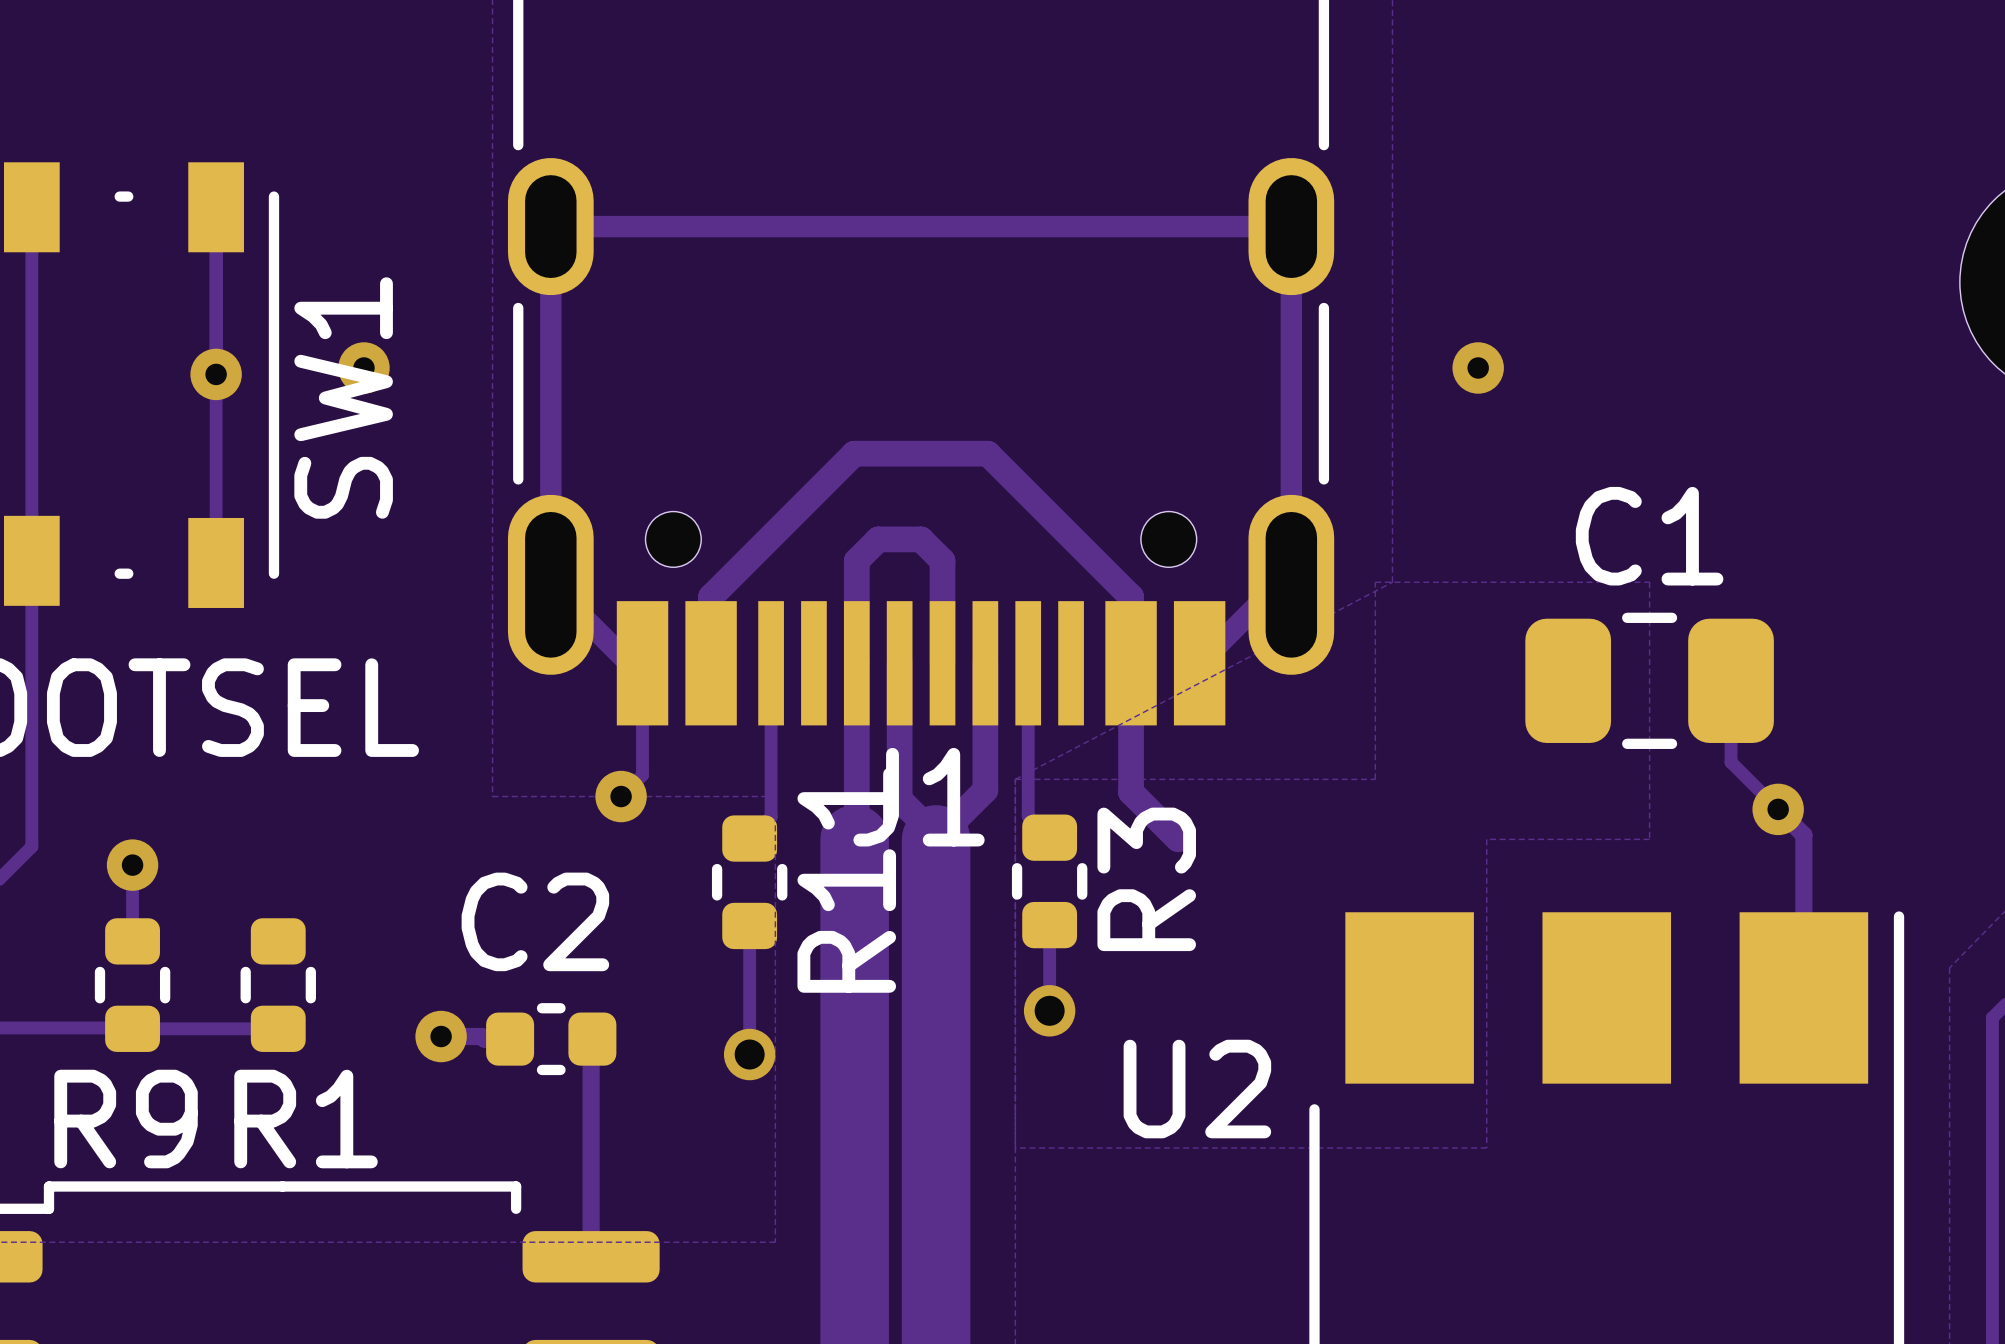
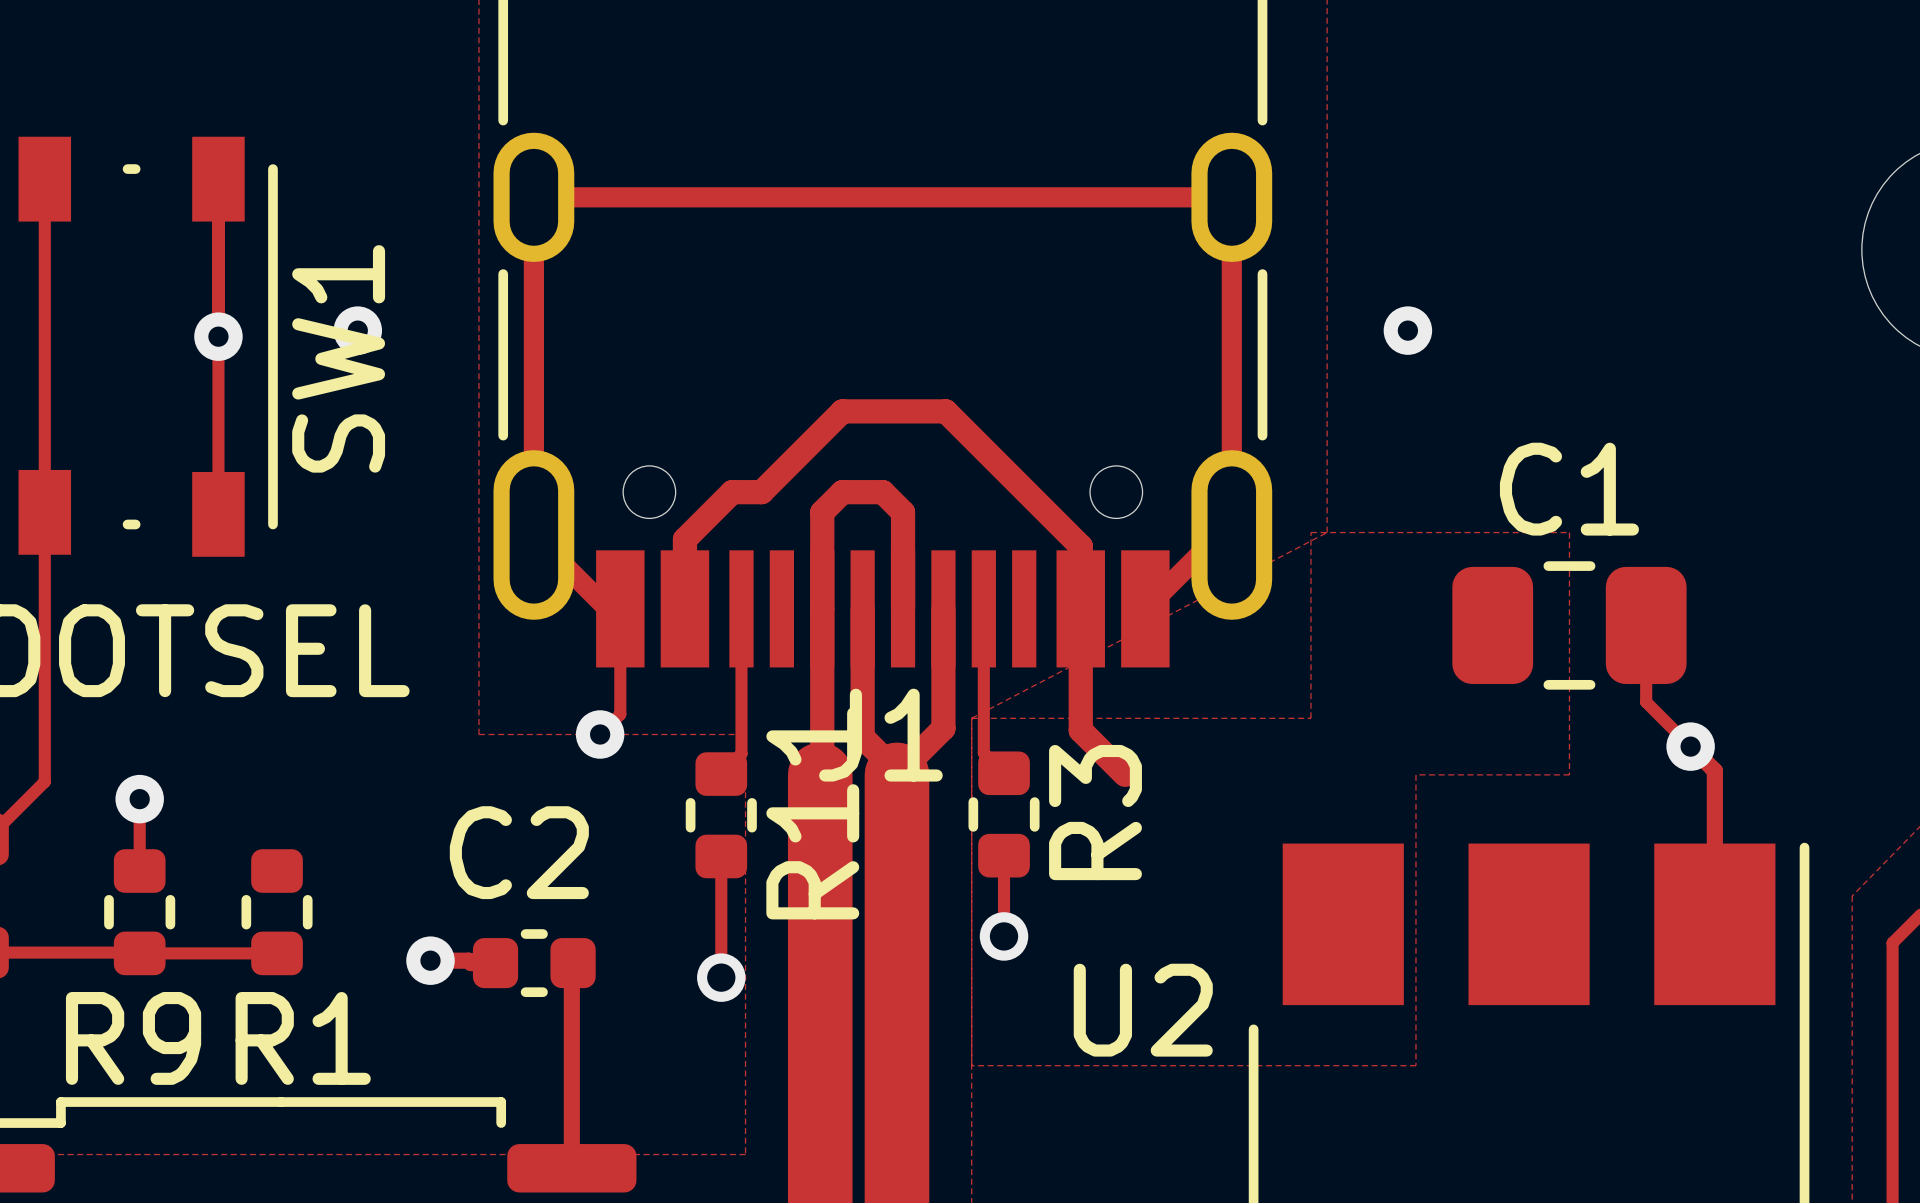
track: (878, 453) (854, 453) (711, 596) -> (842, 411) (761, 492) (732, 492) (684, 539) (684, 546)

